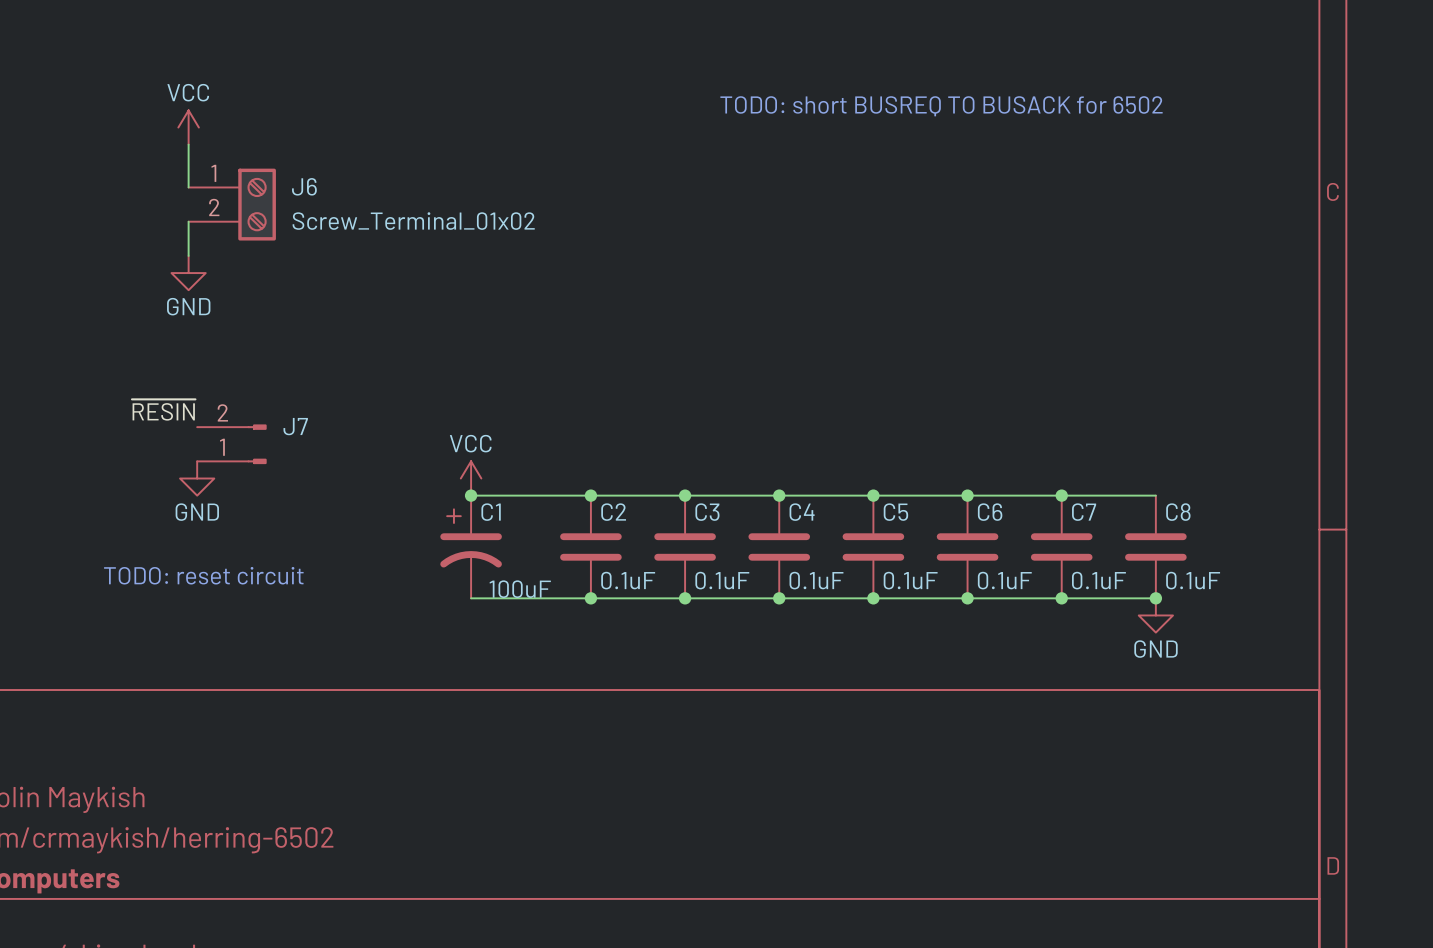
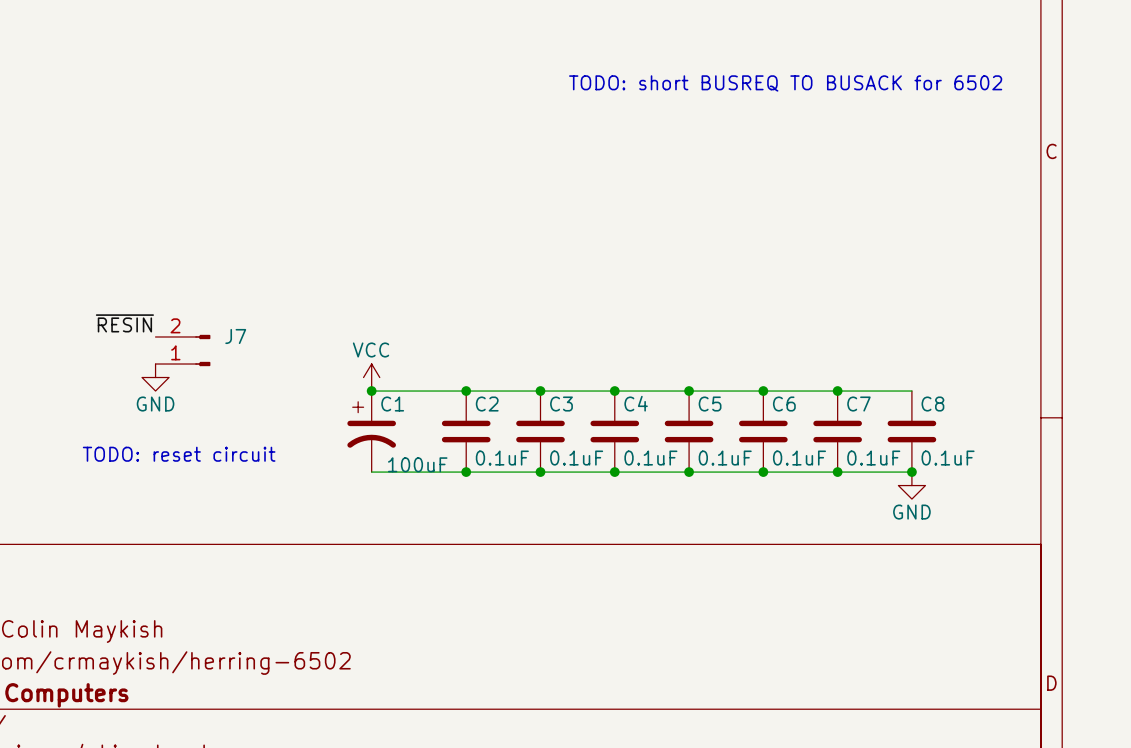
power symbol: VCC (188, 127) -> none
wire: (188, 144) (188, 187) -> none
J6: Screw_Terminal_01x02 (232, 204) -> none
wire: (188, 221) (188, 255) -> none
power symbol: GND (188, 273) -> none

